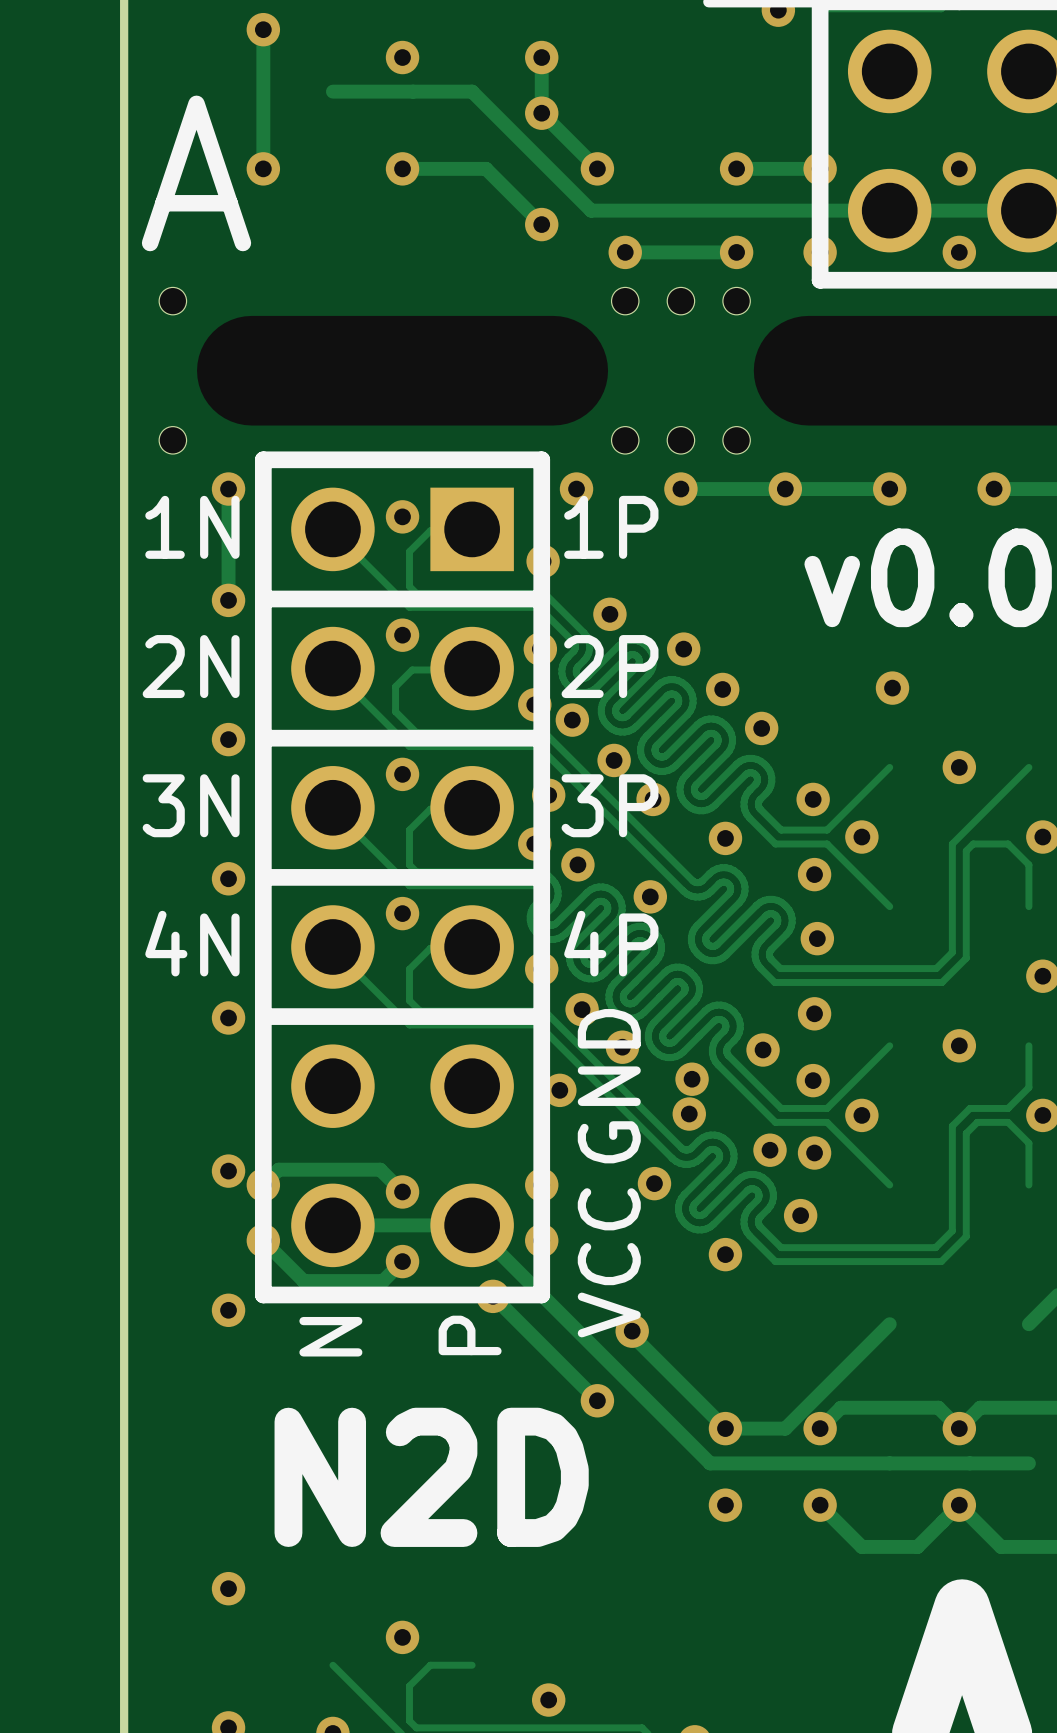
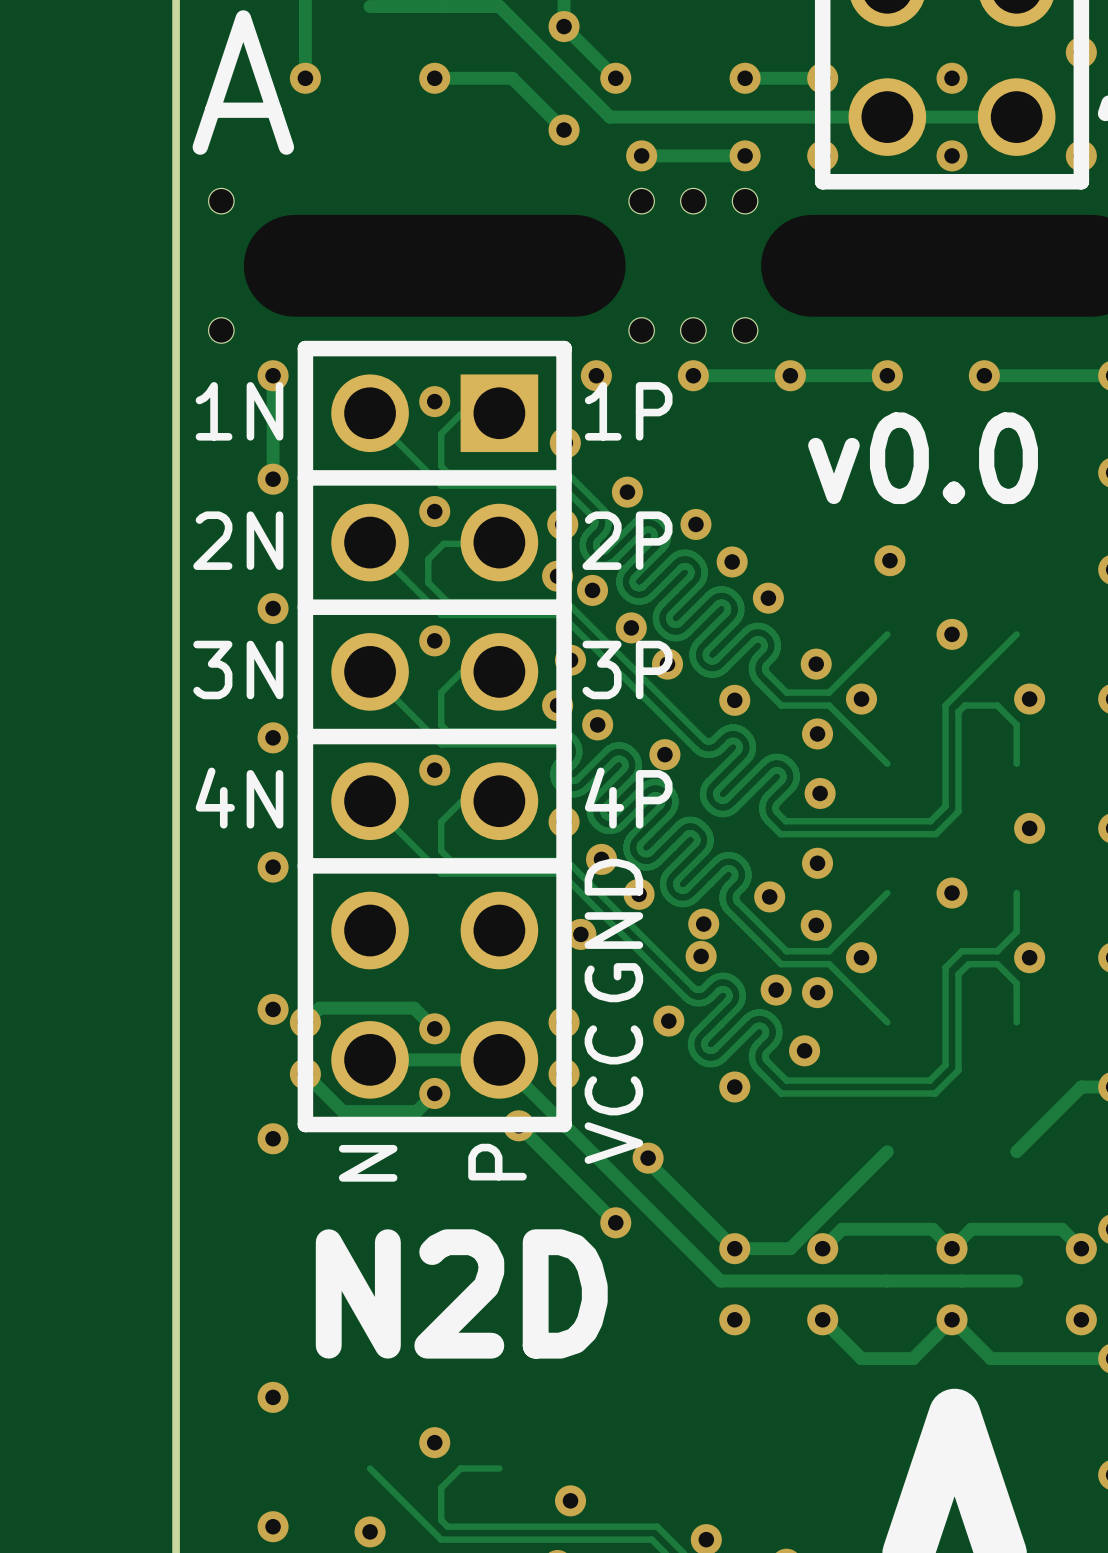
part text position: GND (609, 1086) -> GND (613, 930)
part text position: VCC (609, 1262) -> VCC (613, 1094)

